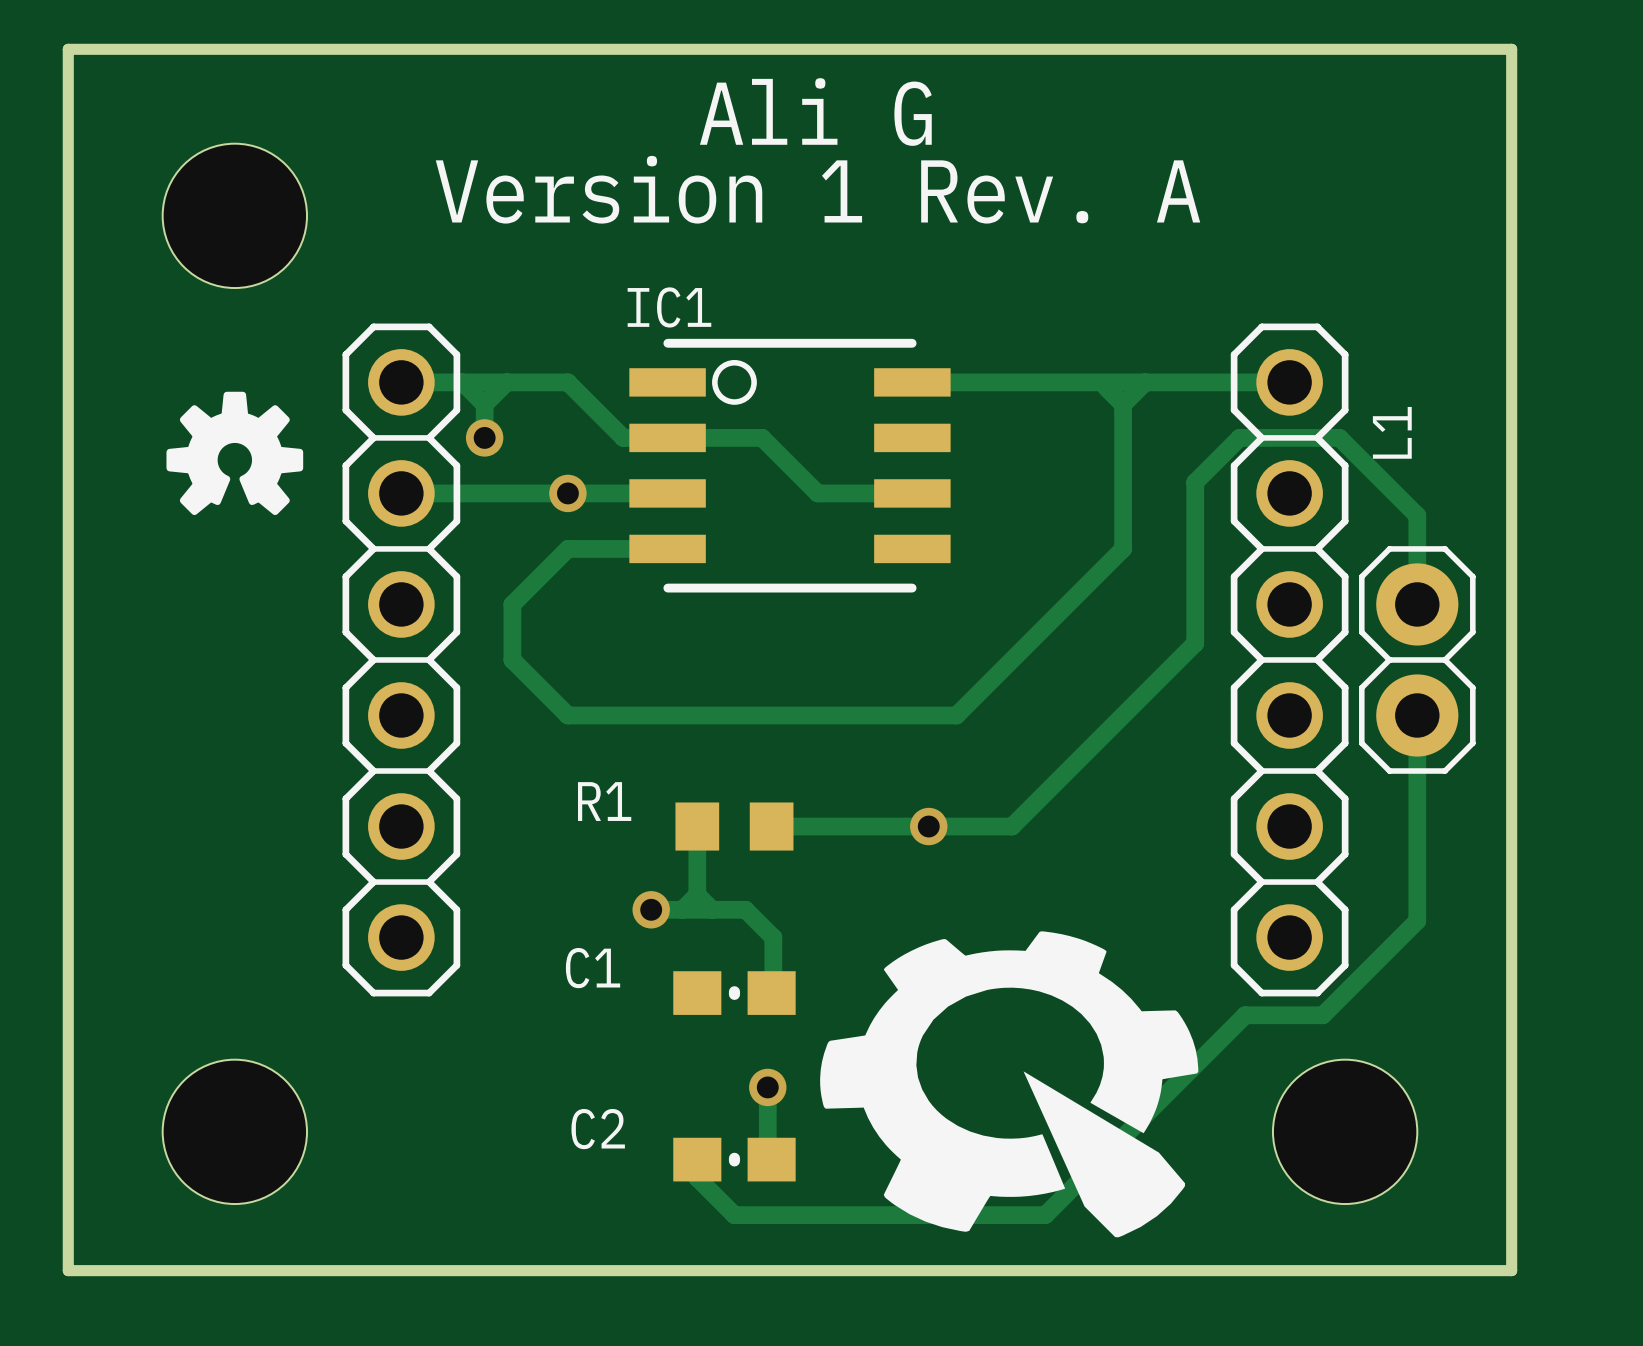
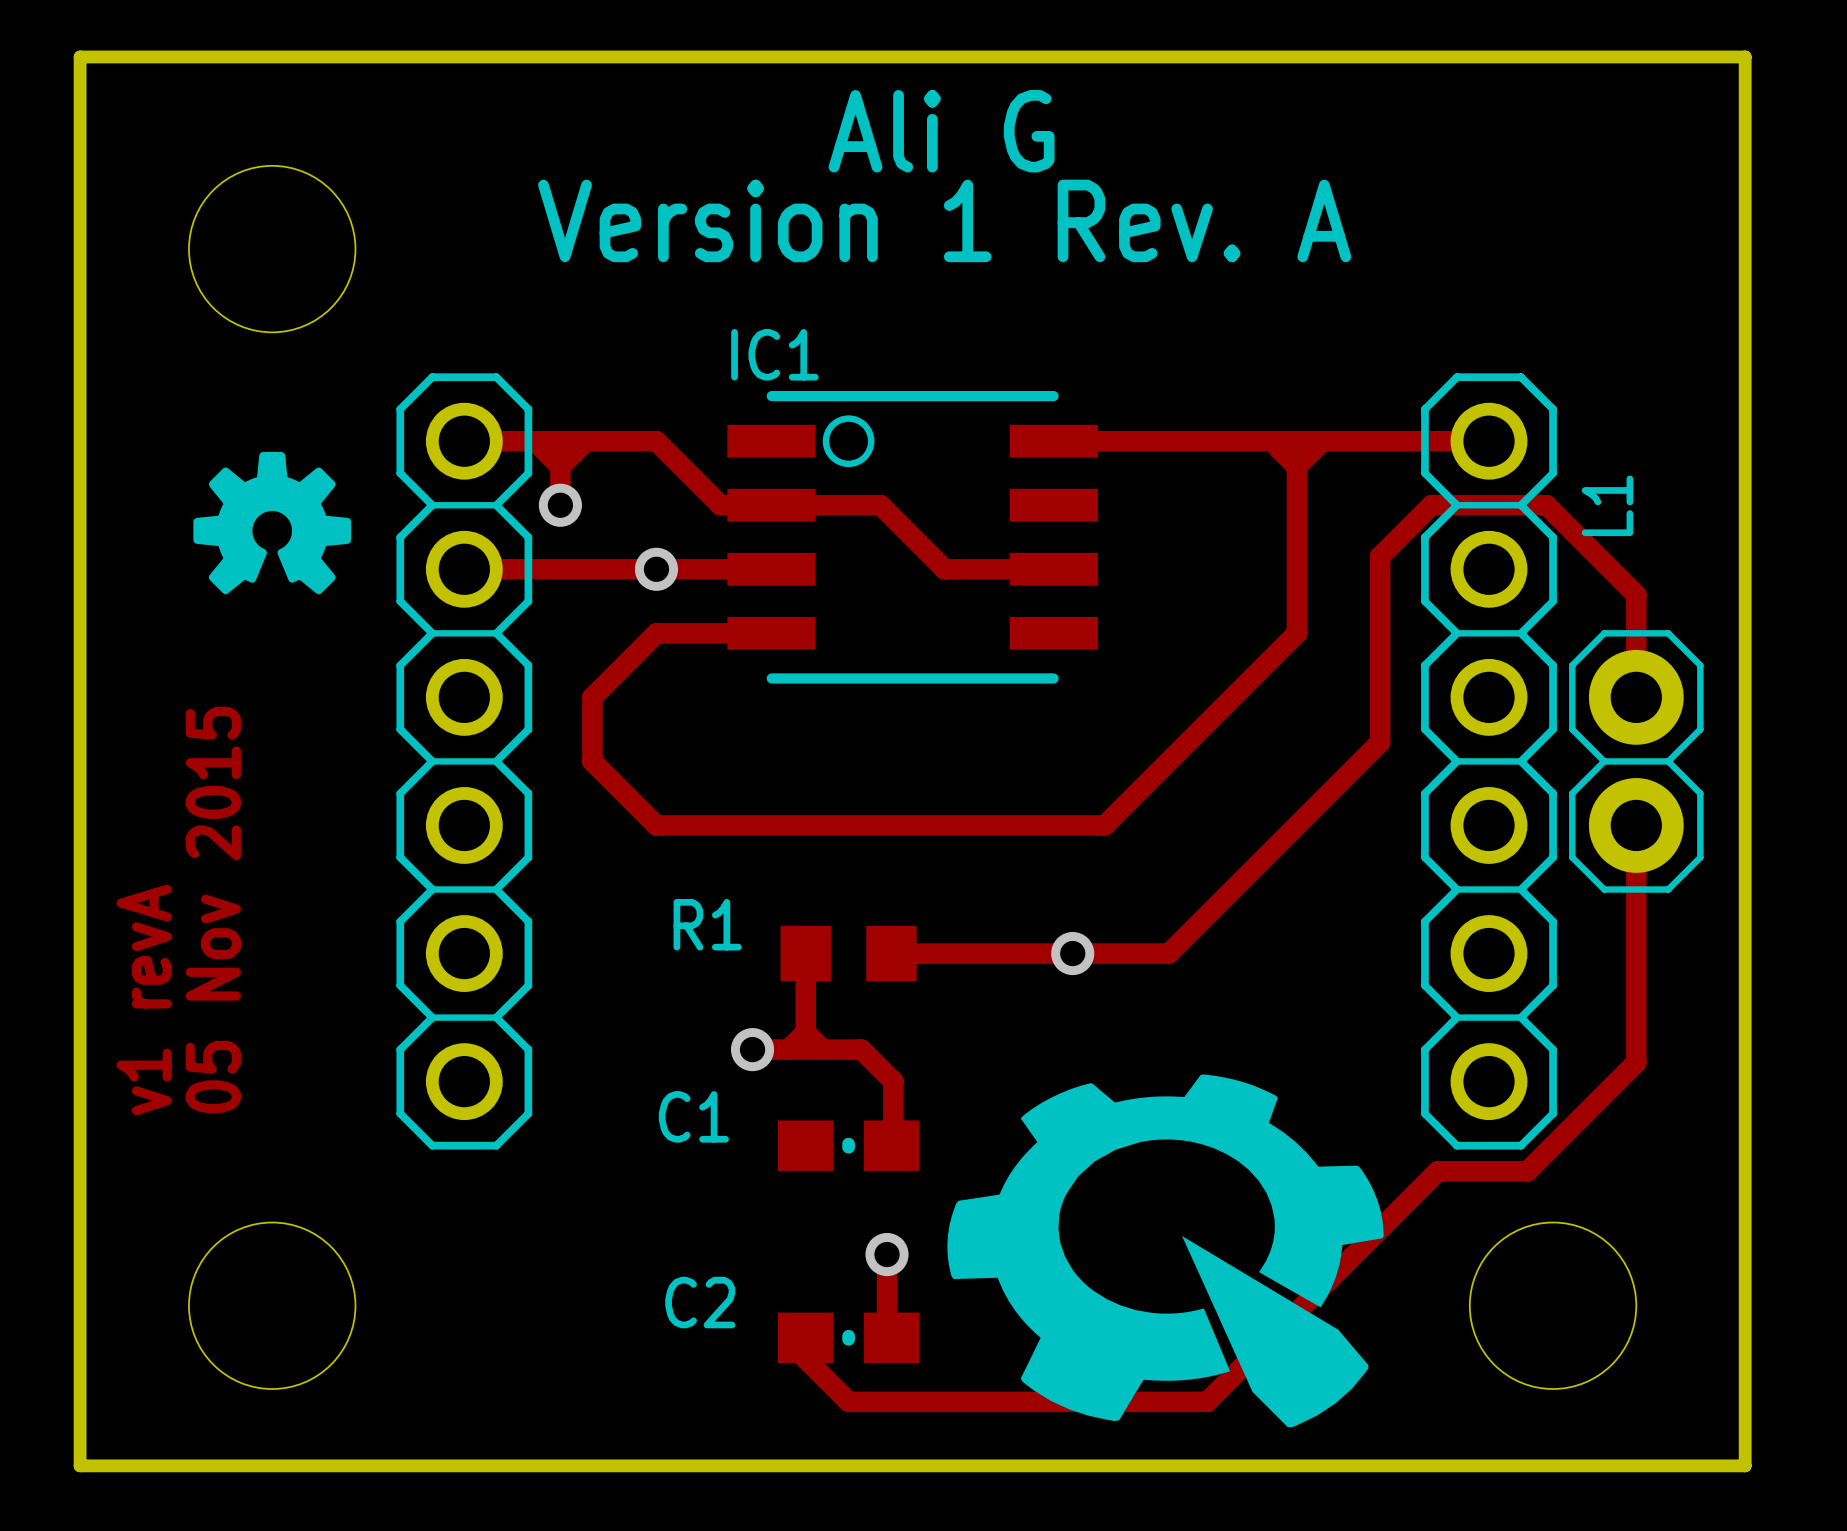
text: none -> 05 Nov 2015 (213, 910)
text: none -> v1 revA (144, 999)

